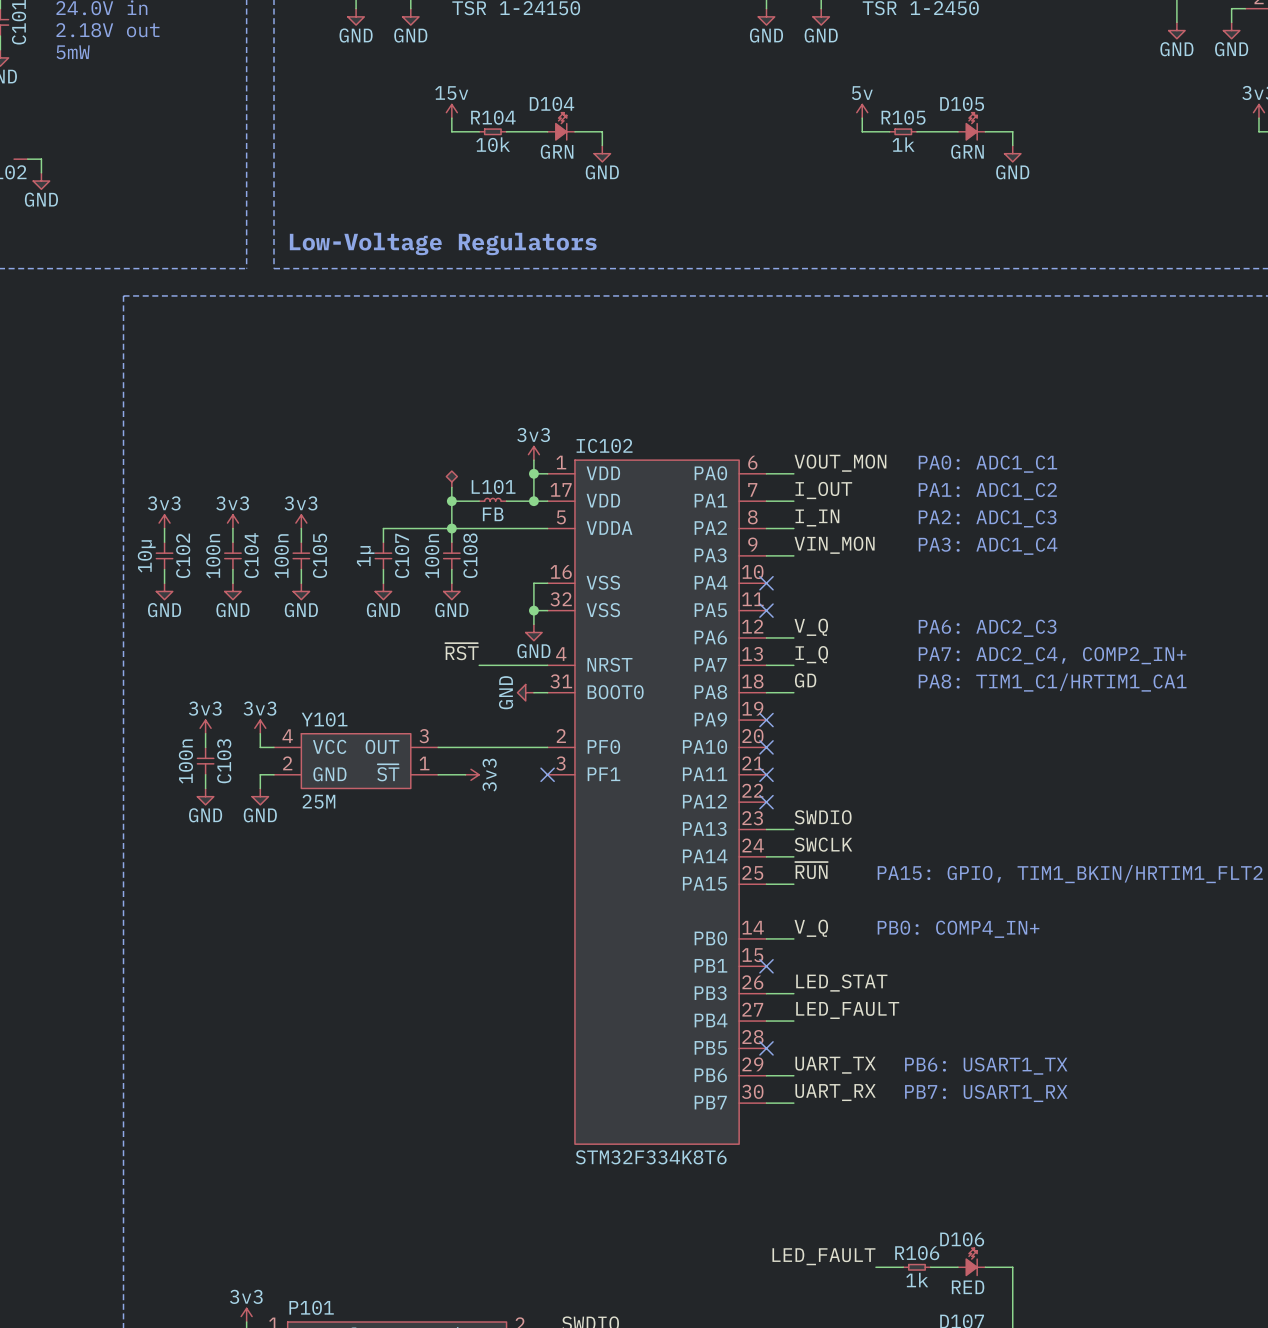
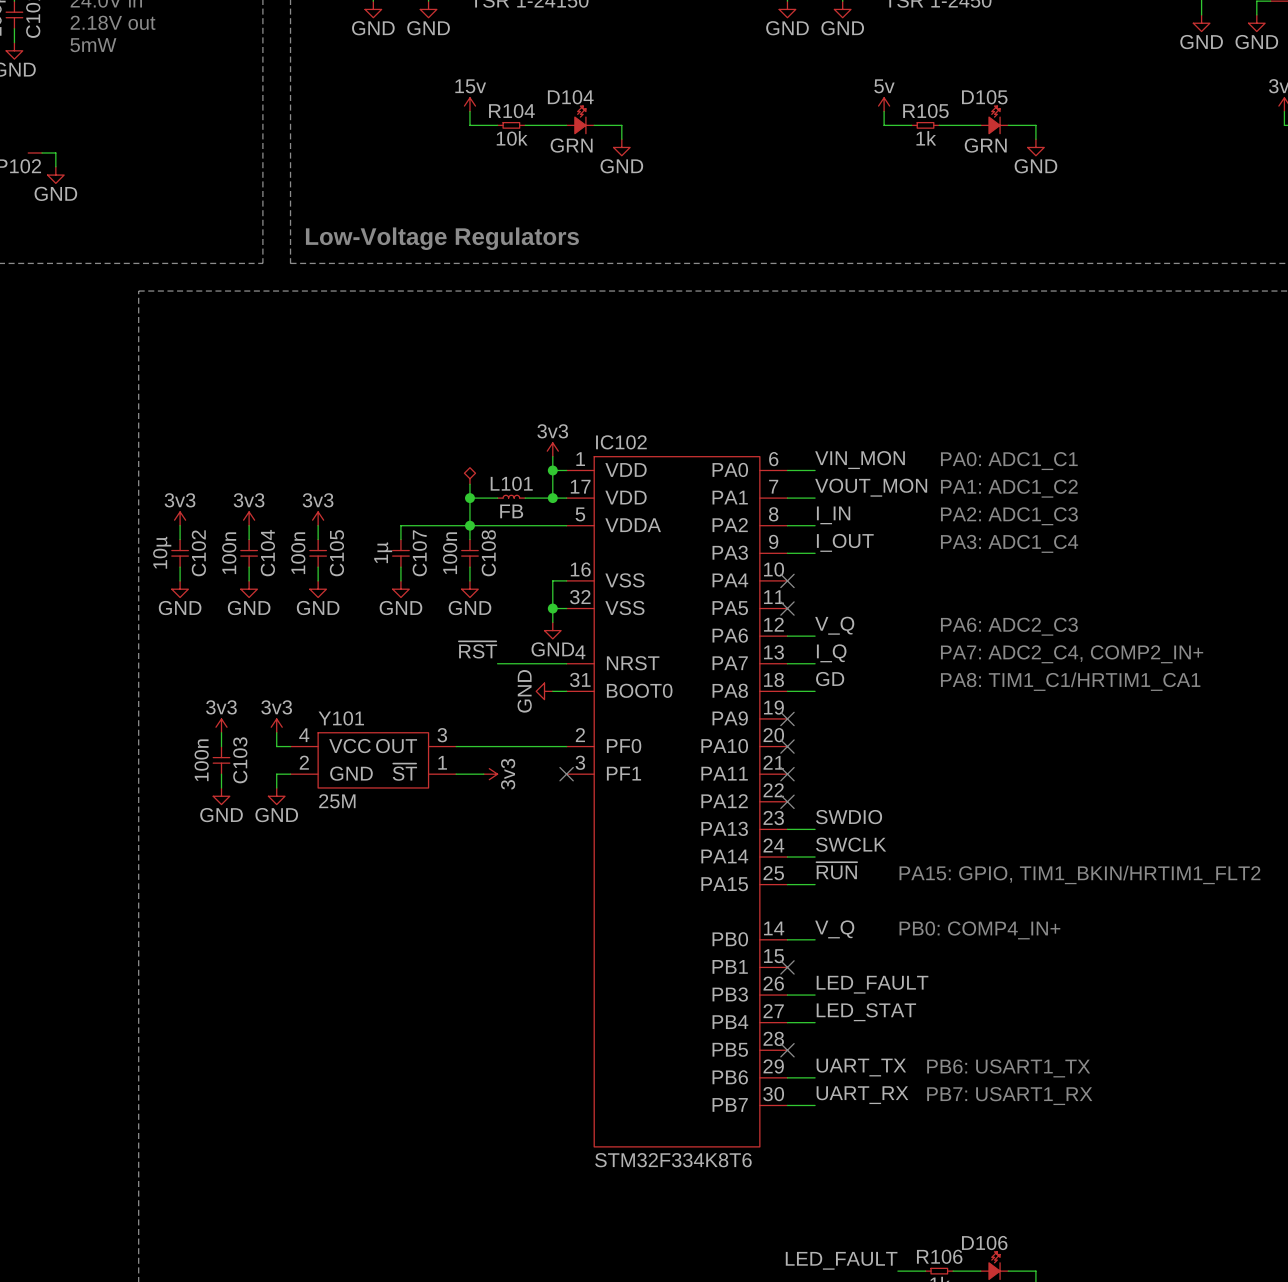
label: VOUT_MON (840, 463) -> VIN_MON (860, 460)
label: I_OUT (823, 490) -> VOUT_MON (871, 487)
label: VIN_MON (834, 545) -> I_OUT (845, 542)
label: LED_STAT (841, 983) -> LED_FAULT (872, 984)
label: LED_FAULT (847, 1010) -> LED_STAT (866, 1012)

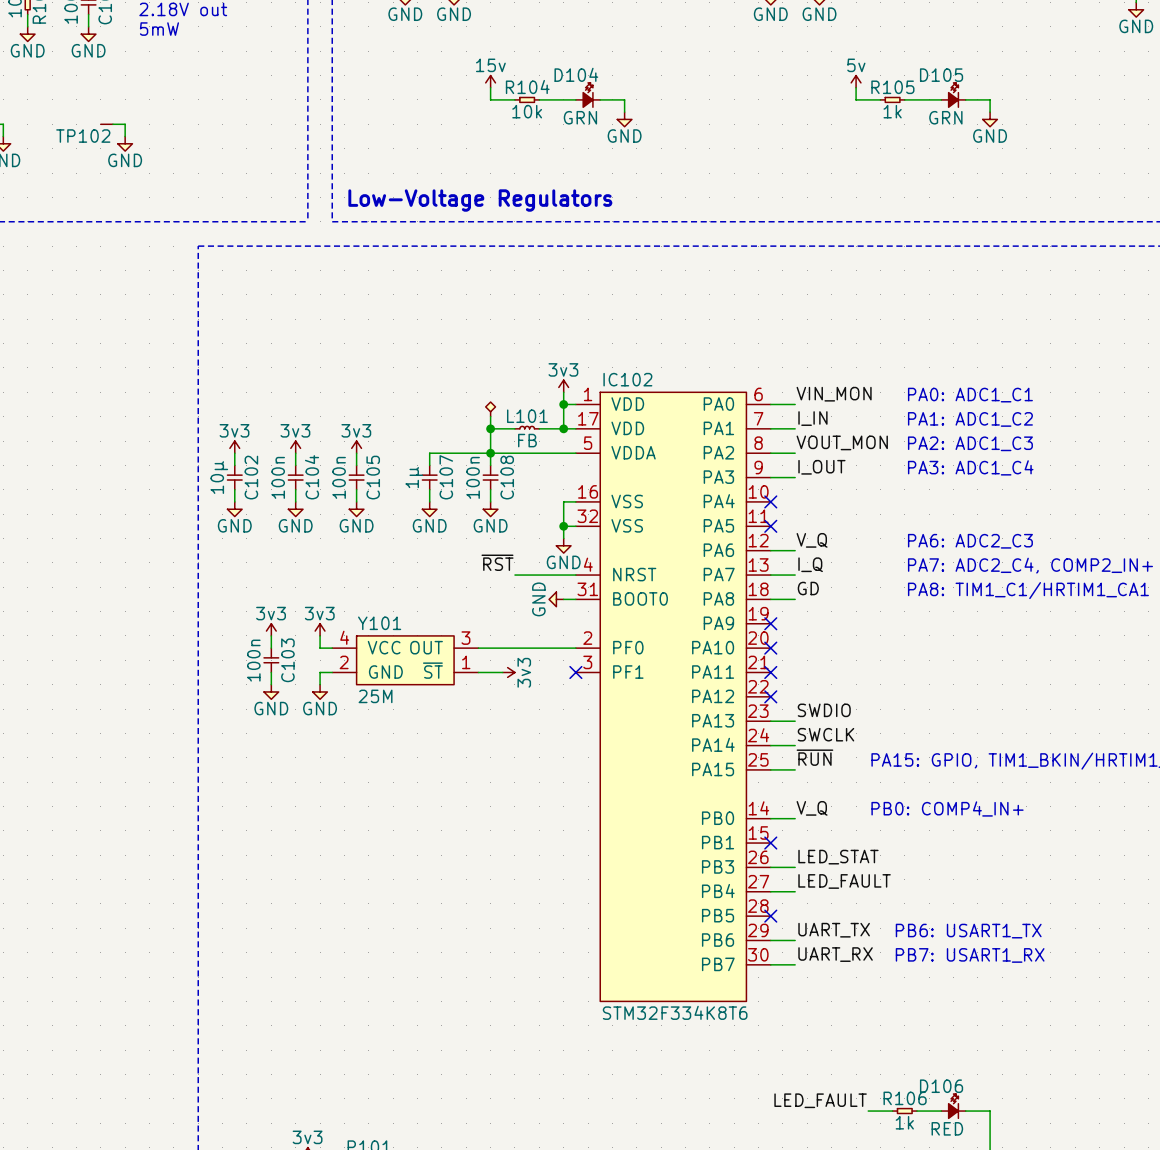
label: VOUT_MON (871, 487) -> I_IN (812, 418)
label: I_IN (833, 515) -> VOUT_MON (842, 442)
label: LED_FAULT (872, 984) -> LED_STAT (838, 857)
label: LED_STAT (866, 1012) -> LED_FAULT (844, 881)

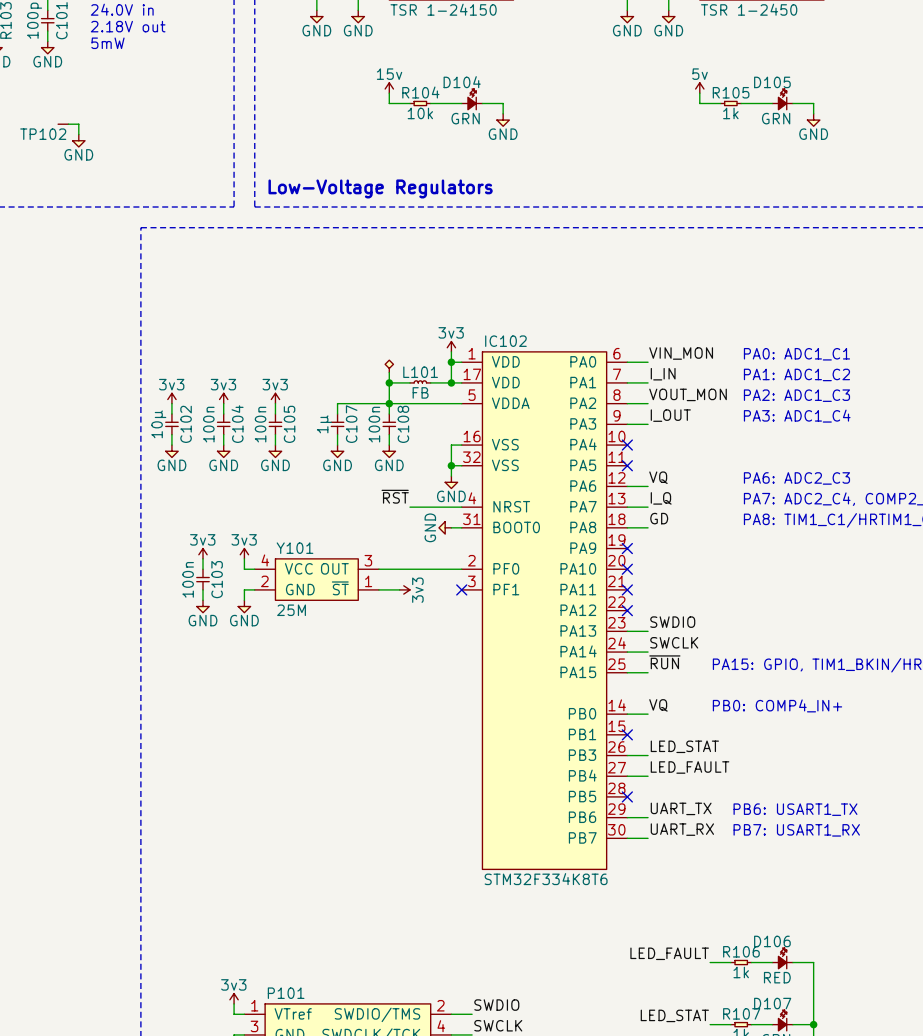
label: V_Q (812, 540) -> VQ (658, 477)
label: V_Q (812, 808) -> VQ (658, 705)

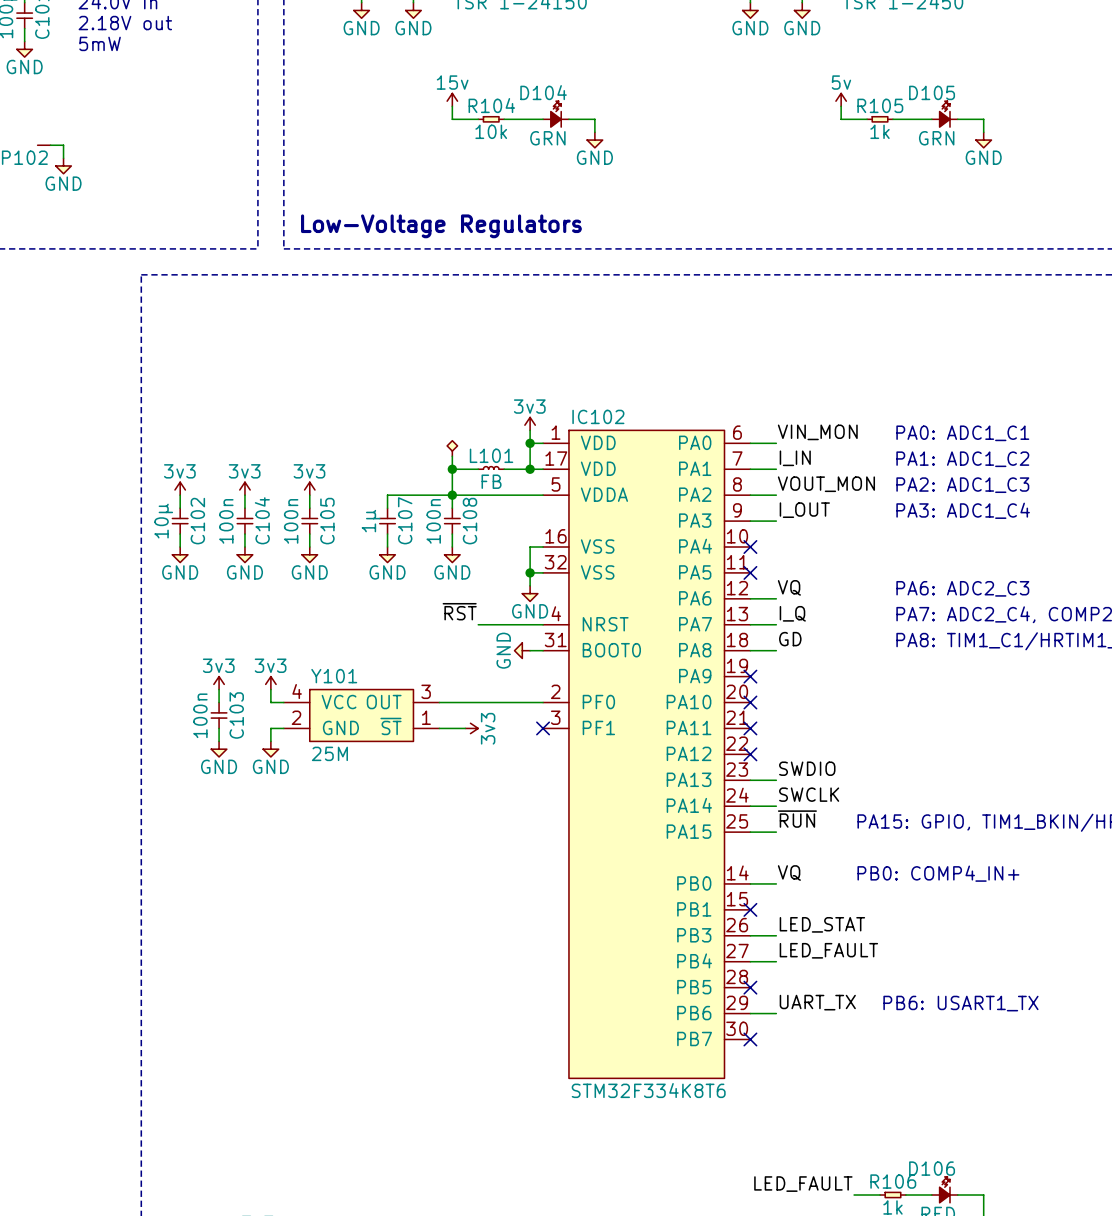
label: UART_RX (682, 829) -> none
text: PB7: USART1_RX (796, 830) -> none
wire: (627, 838) (648, 838) -> none
no-connect mark: none -> (750, 1039)

